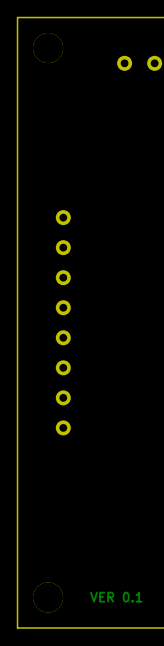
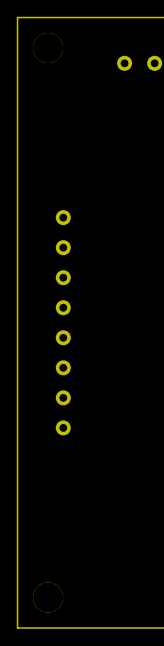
text: VER 0.1 (116, 597) -> none

